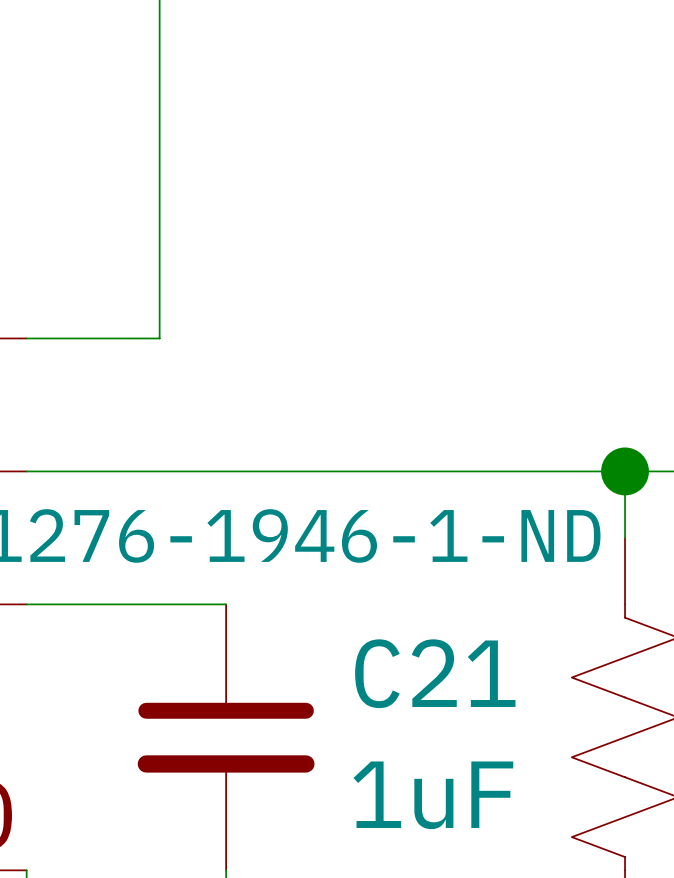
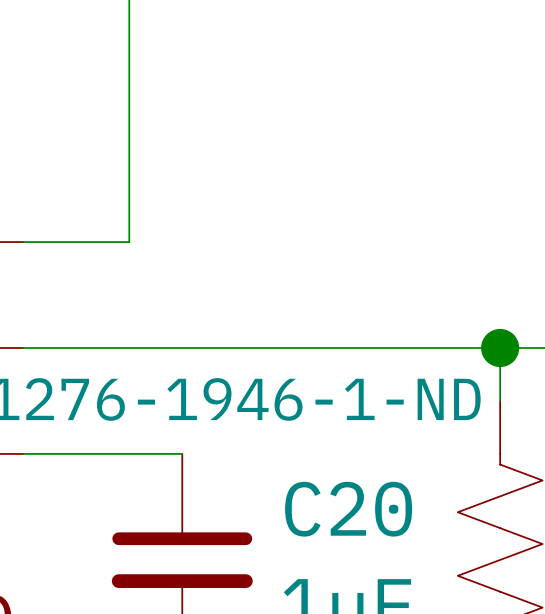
C21 name: C21 (435, 673) -> C20 (348, 509)

